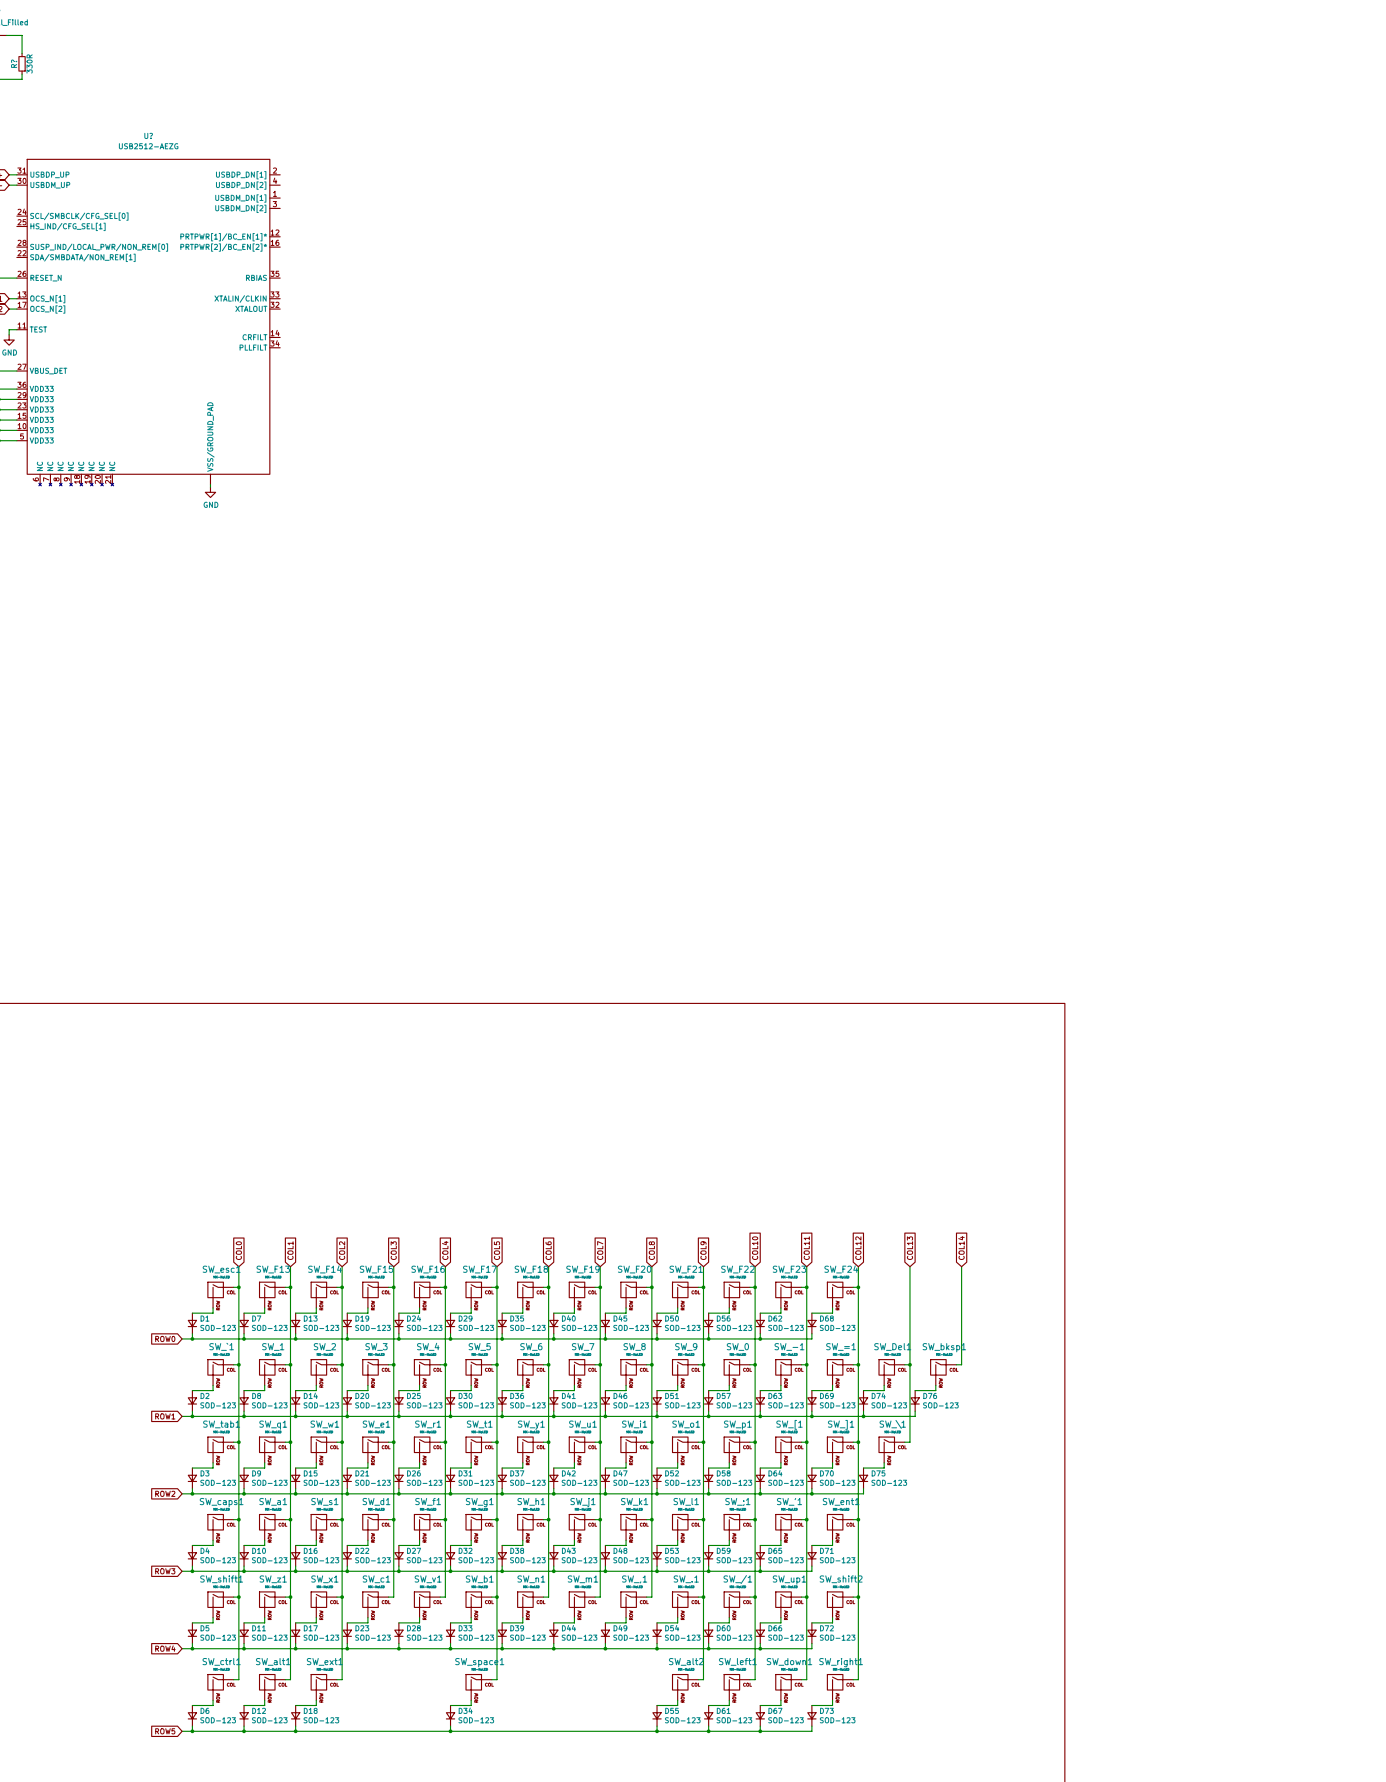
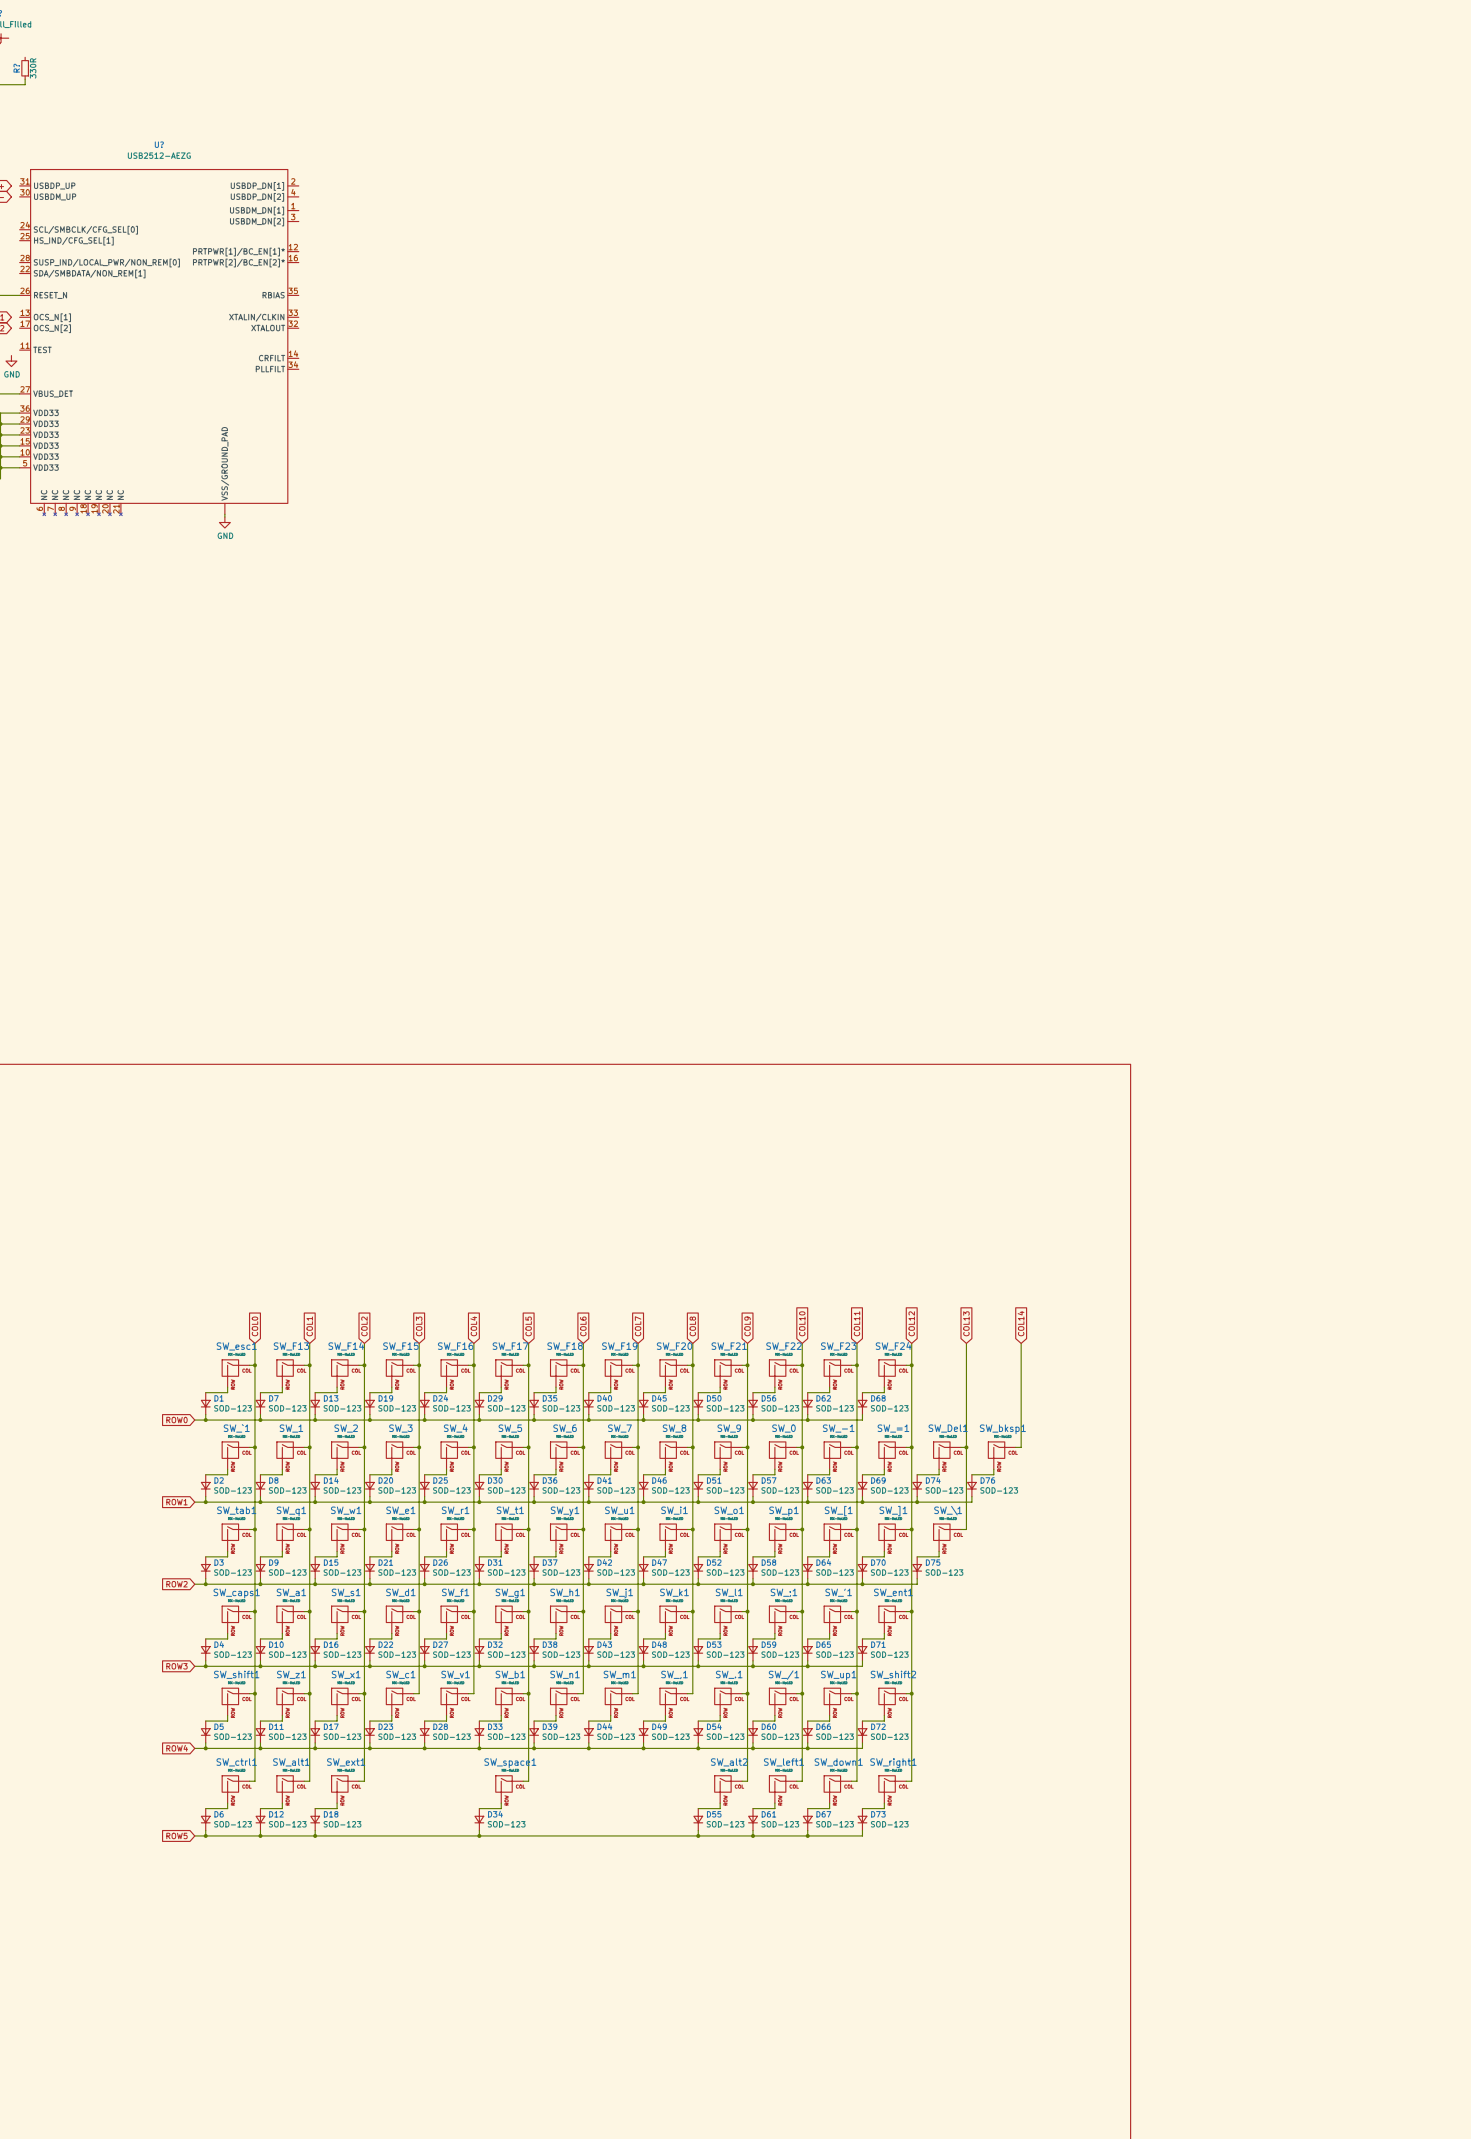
wire: (6, 35) (22, 35) (22, 53) -> none
wire: (9, 174) (16, 174) -> none
wire: (9, 185) (16, 185) -> none
wire: (9, 298) (16, 298) -> none
wire: (9, 309) (16, 309) -> none
wire: (16, 329) (9, 329) (9, 334) -> none

